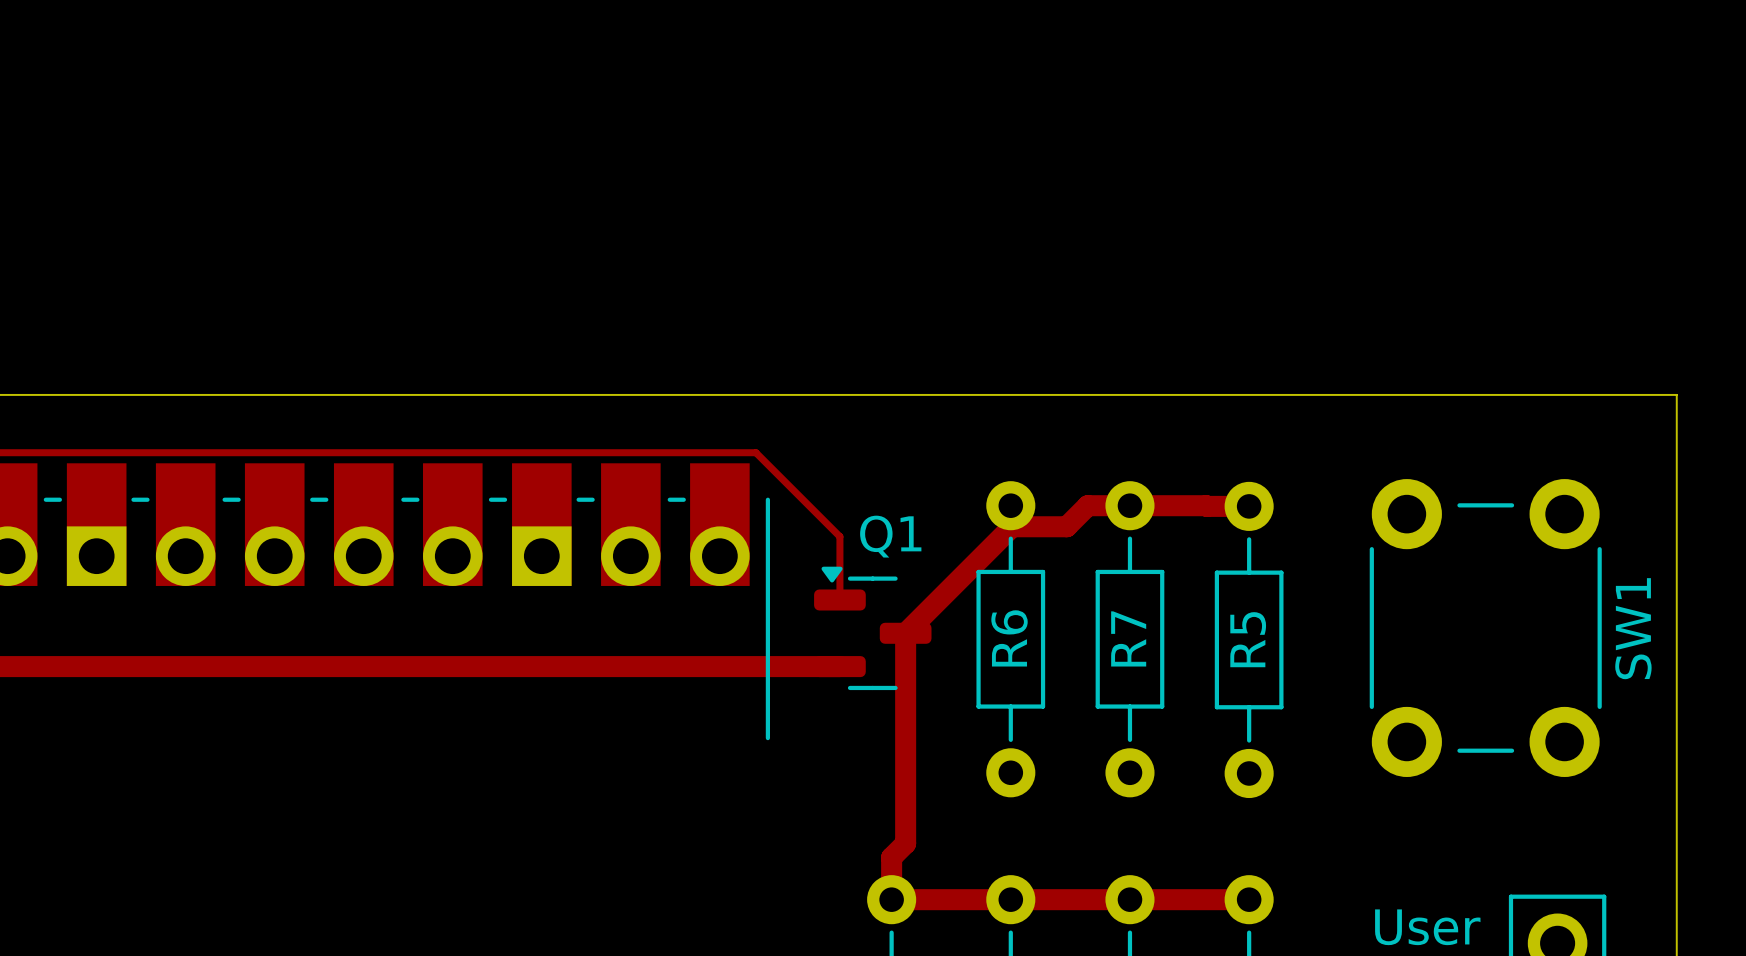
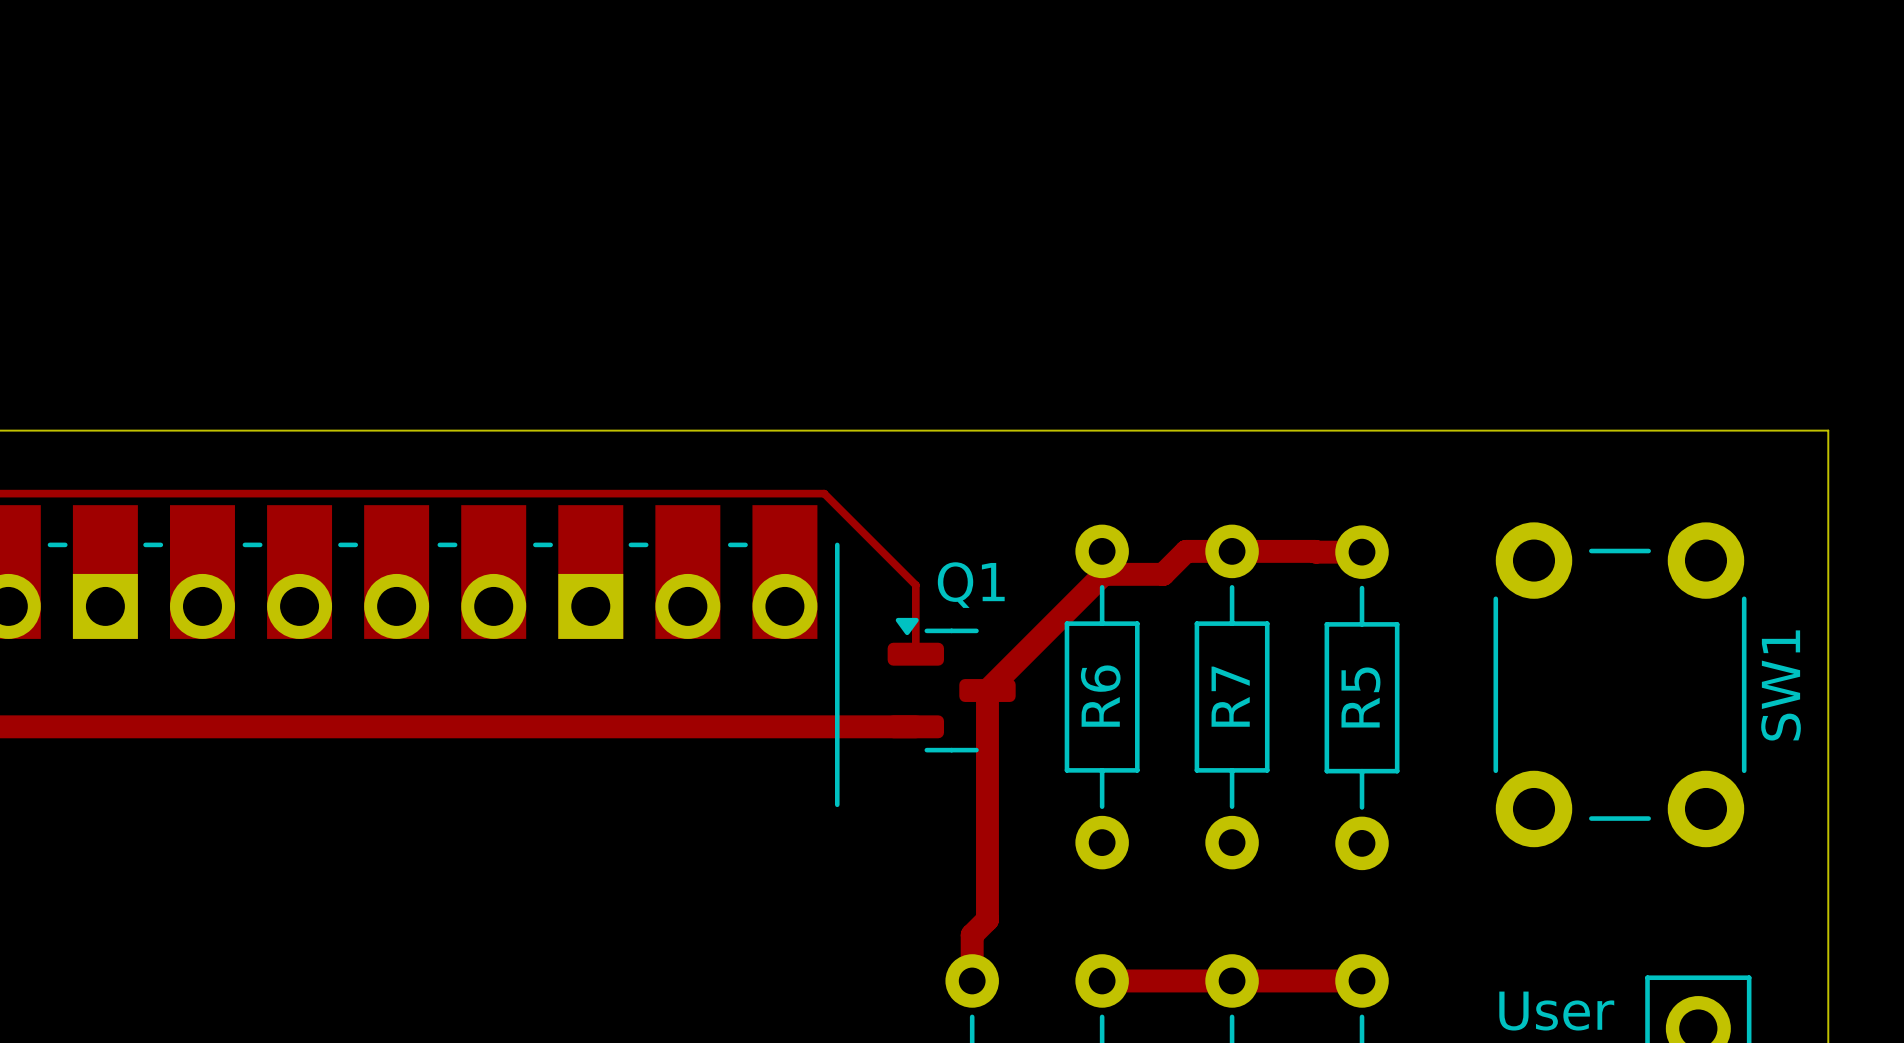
track: (891, 899) (1010, 899) -> none

